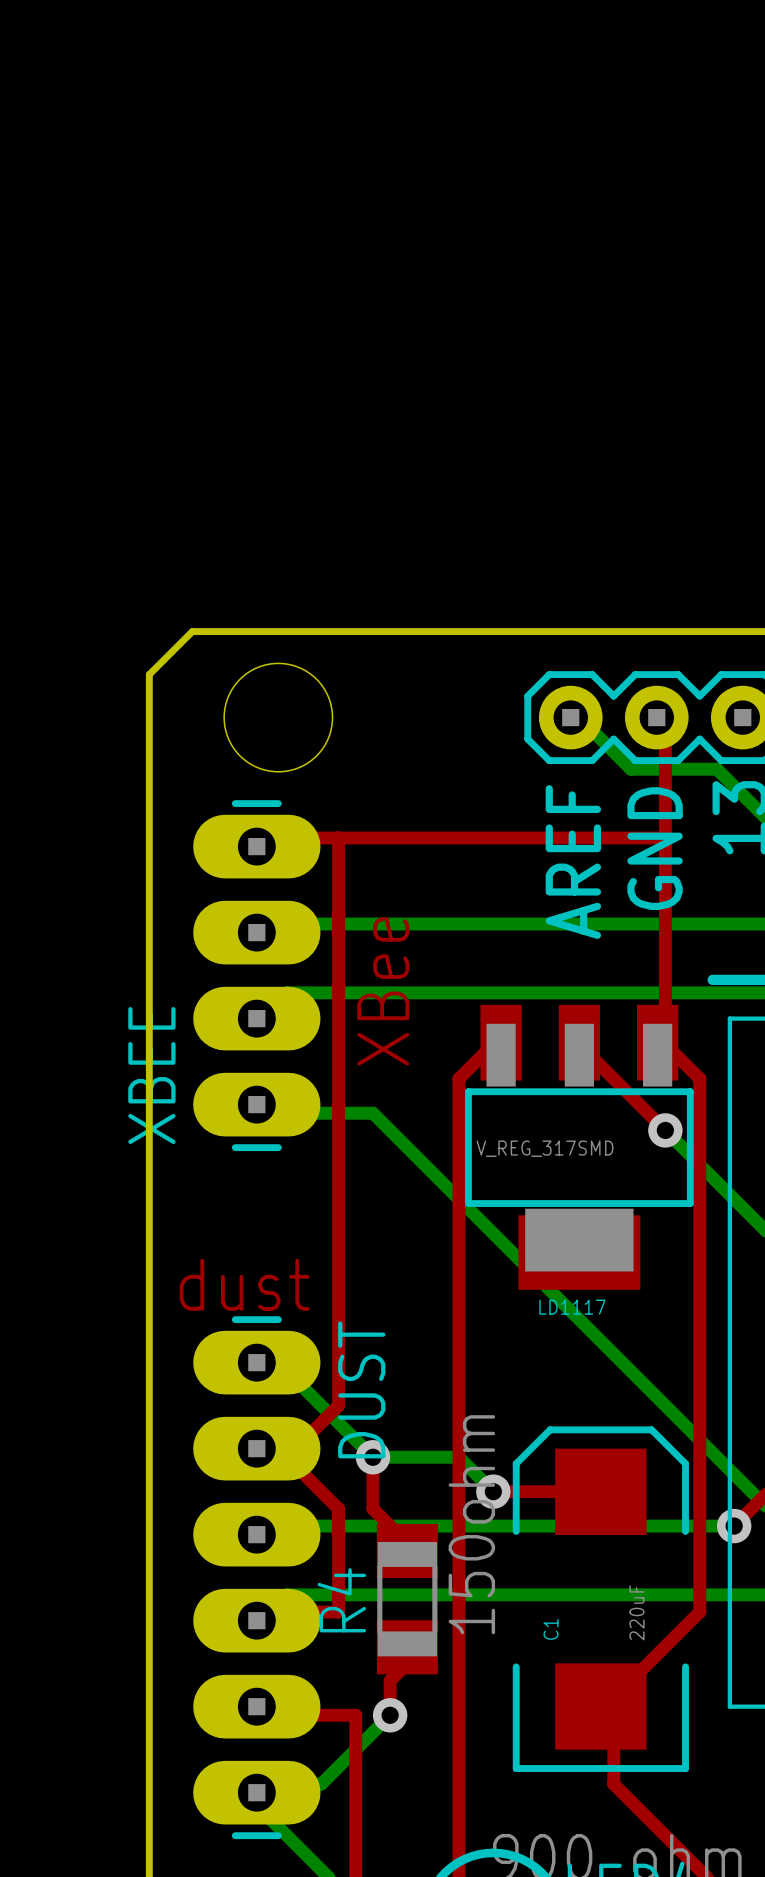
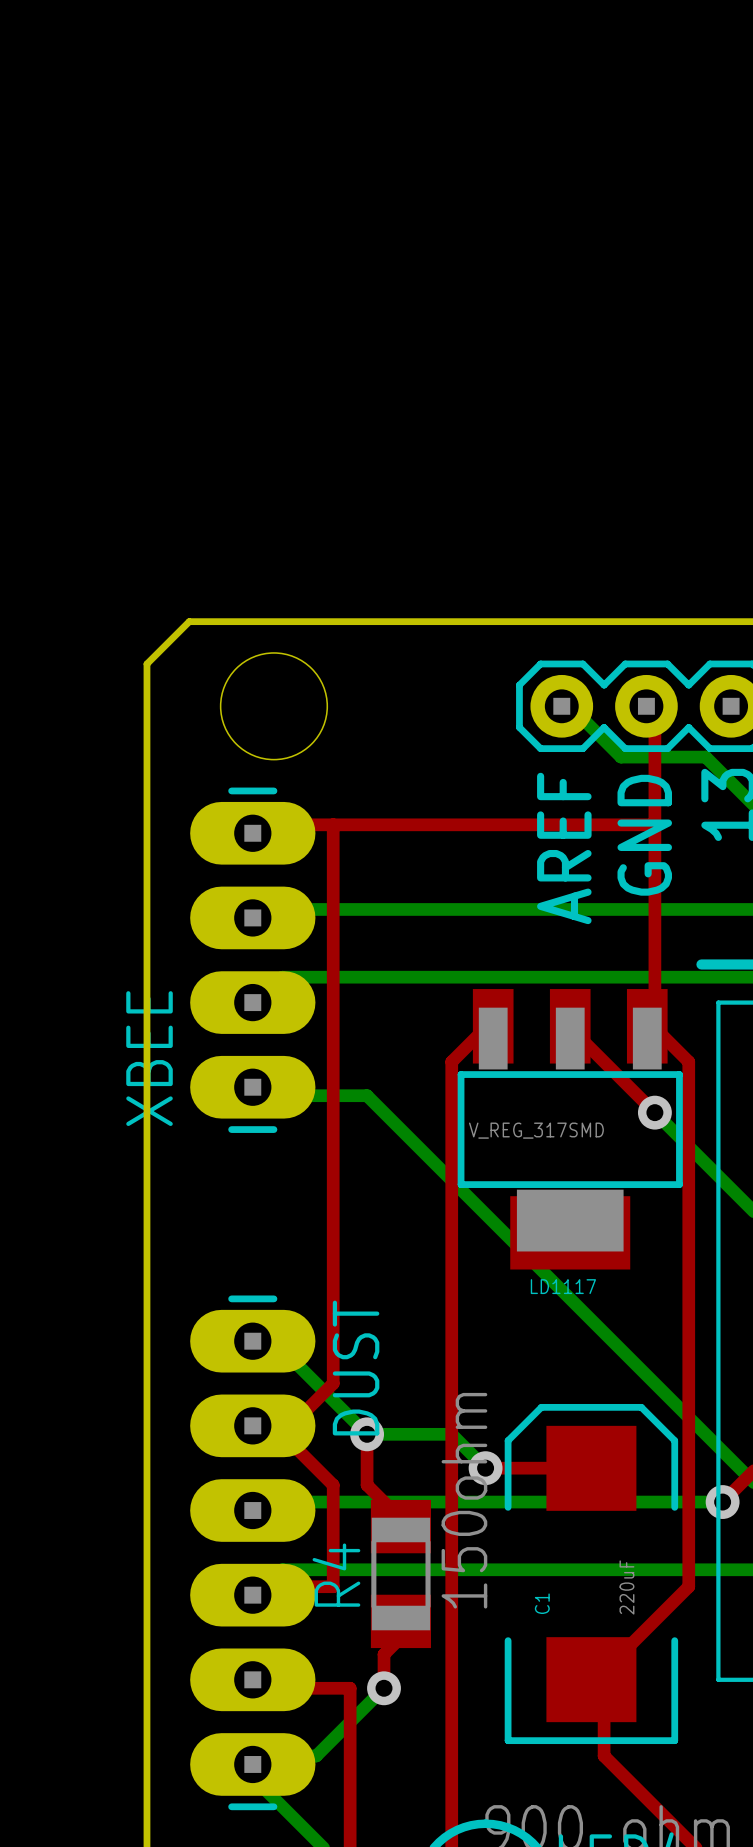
text: XBee (383, 991) -> none
text: dust (244, 1284) -> none

